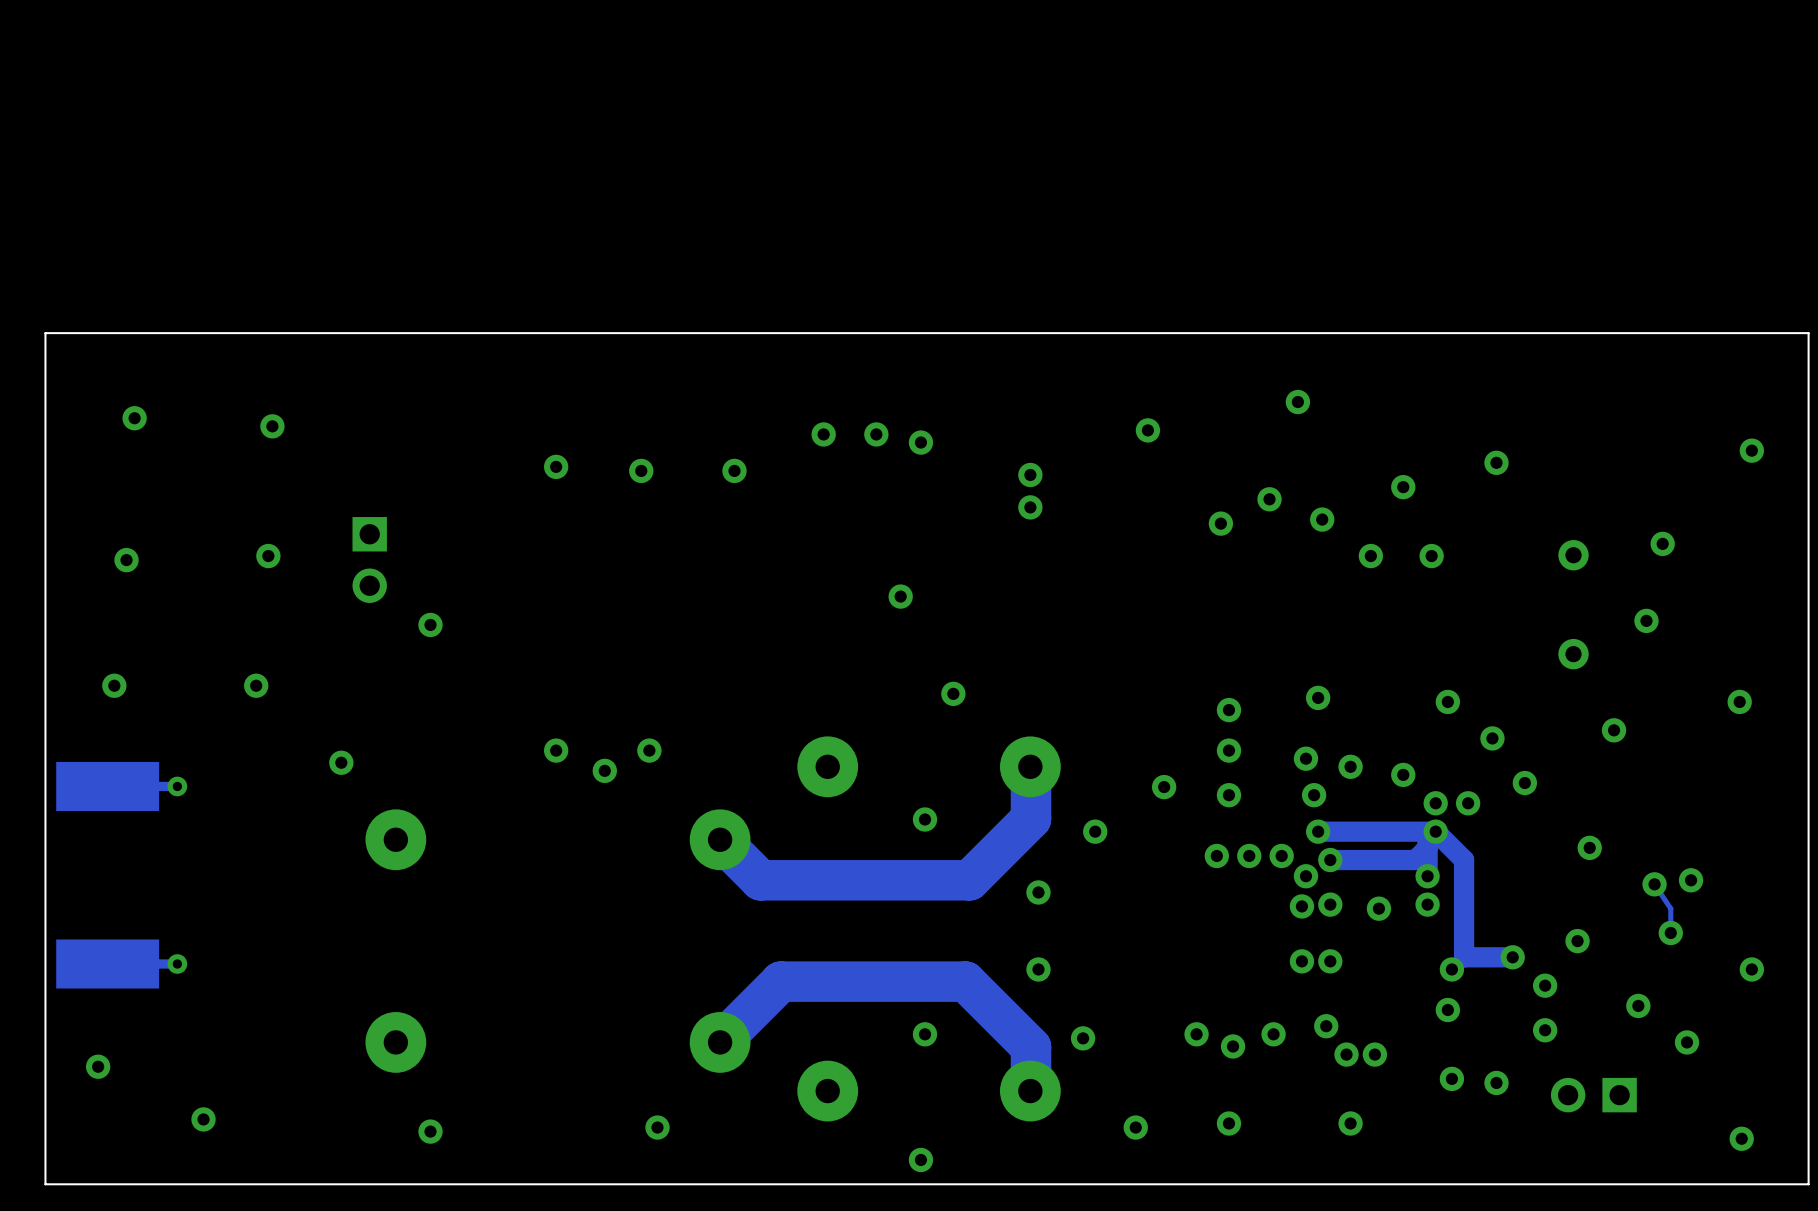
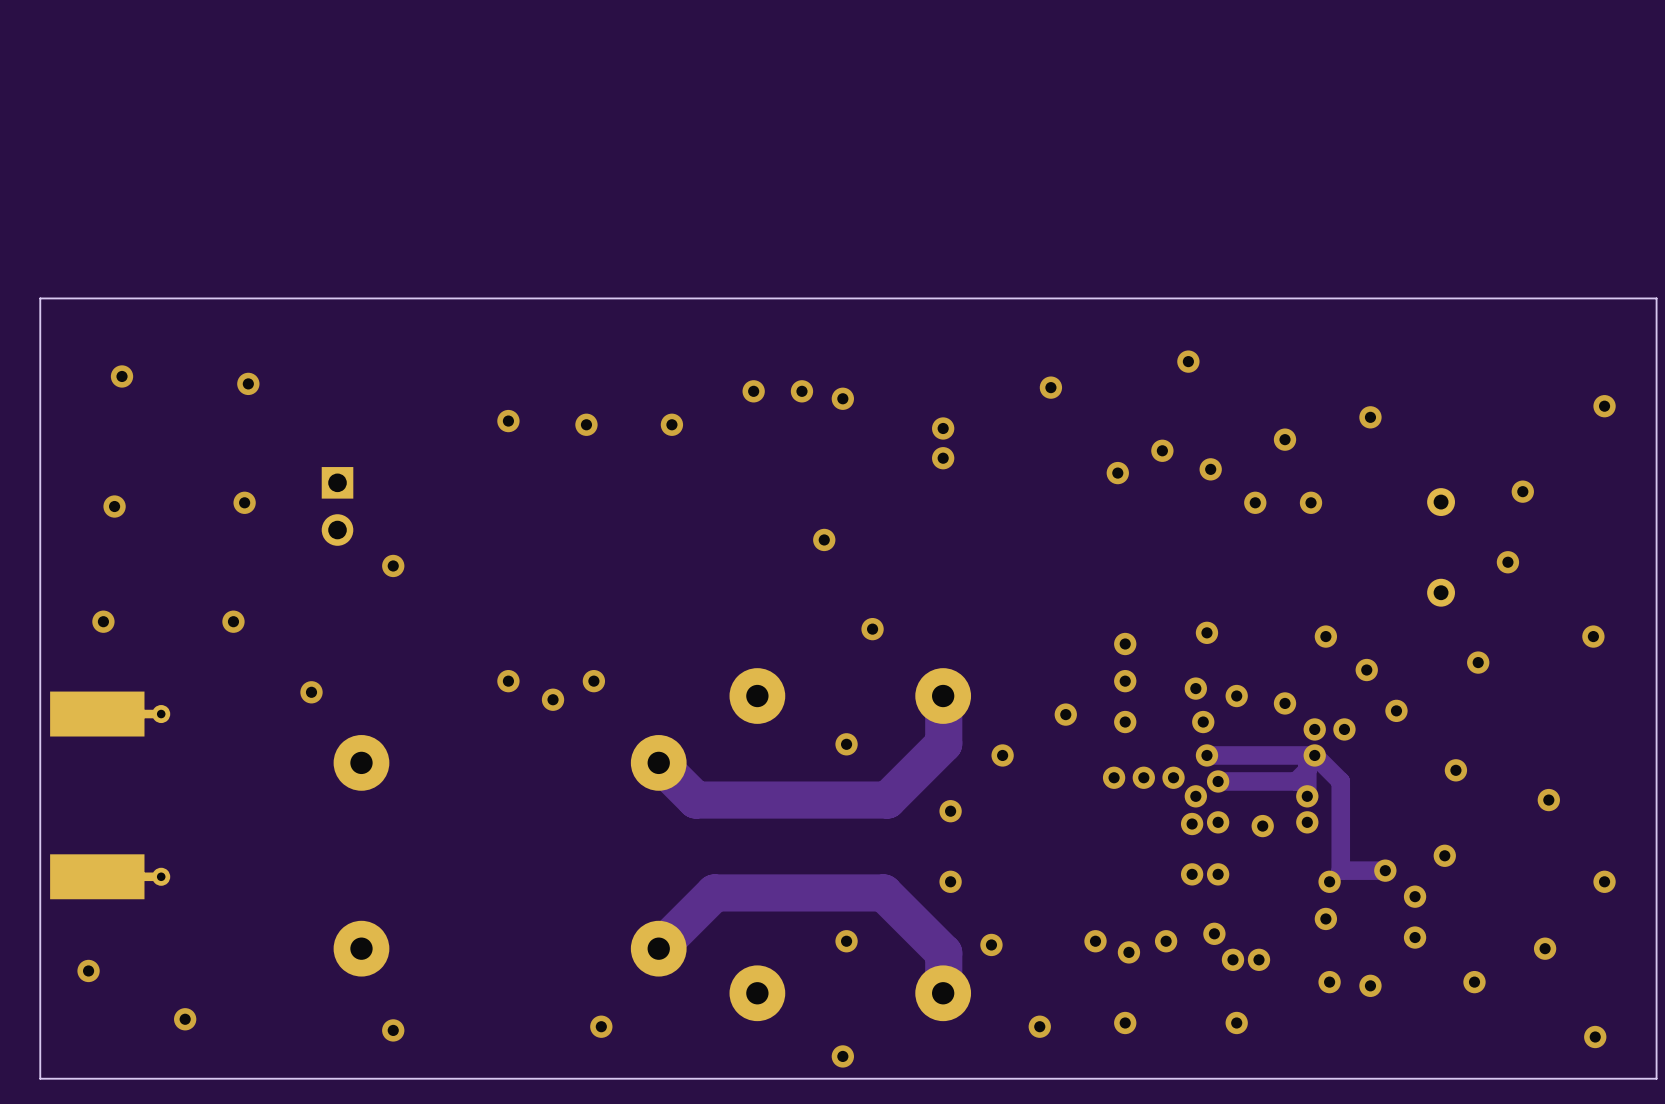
track: (1654, 884) (1670, 908) (1670, 932) -> none
via: (1654, 884) -> none
via: (1670, 932) -> none
via position: (1638, 1005) -> (1474, 982)
part: (1593, 1095) -> none

